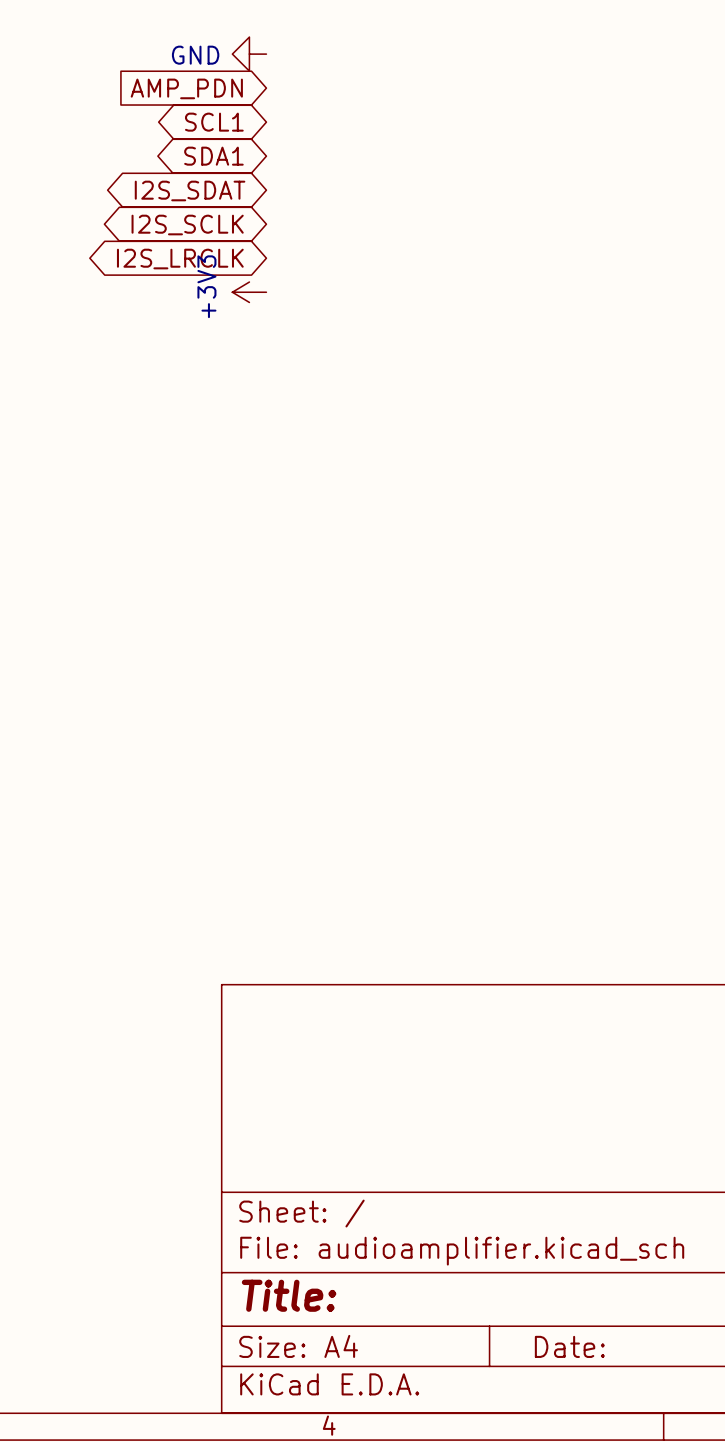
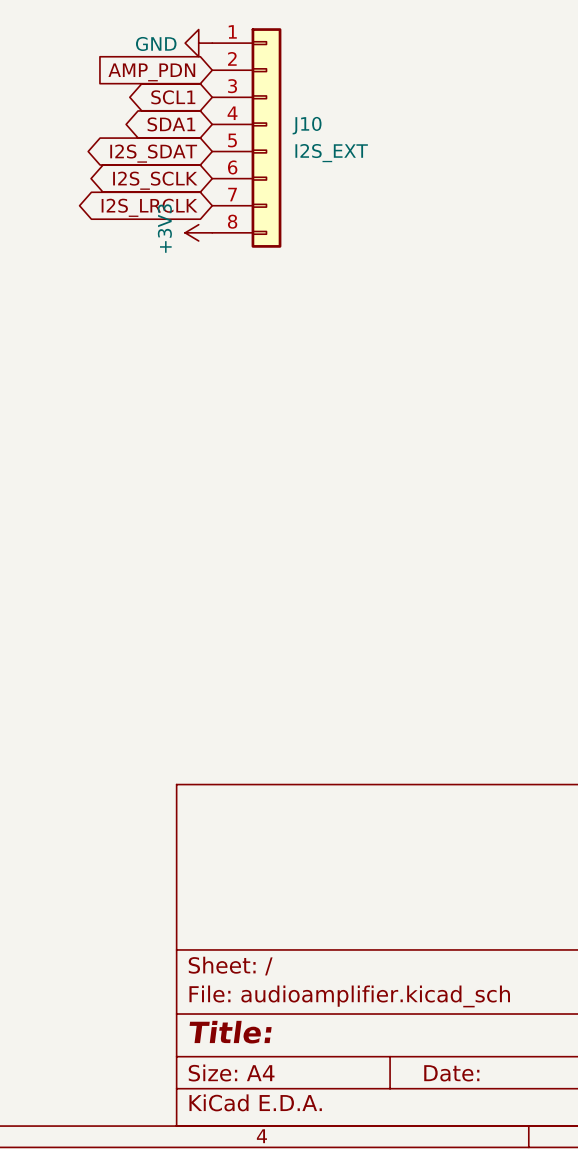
J10: none -> I2S_EXT (246, 137)

